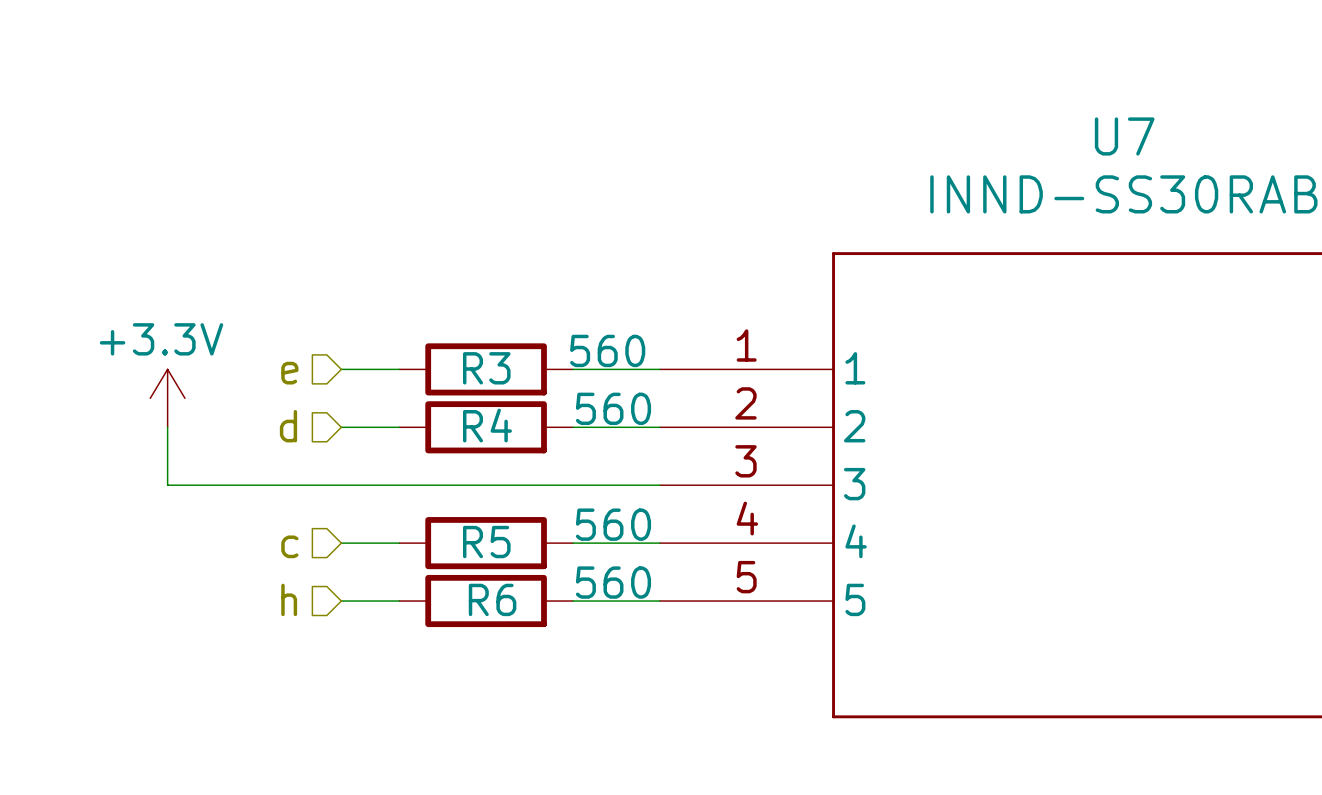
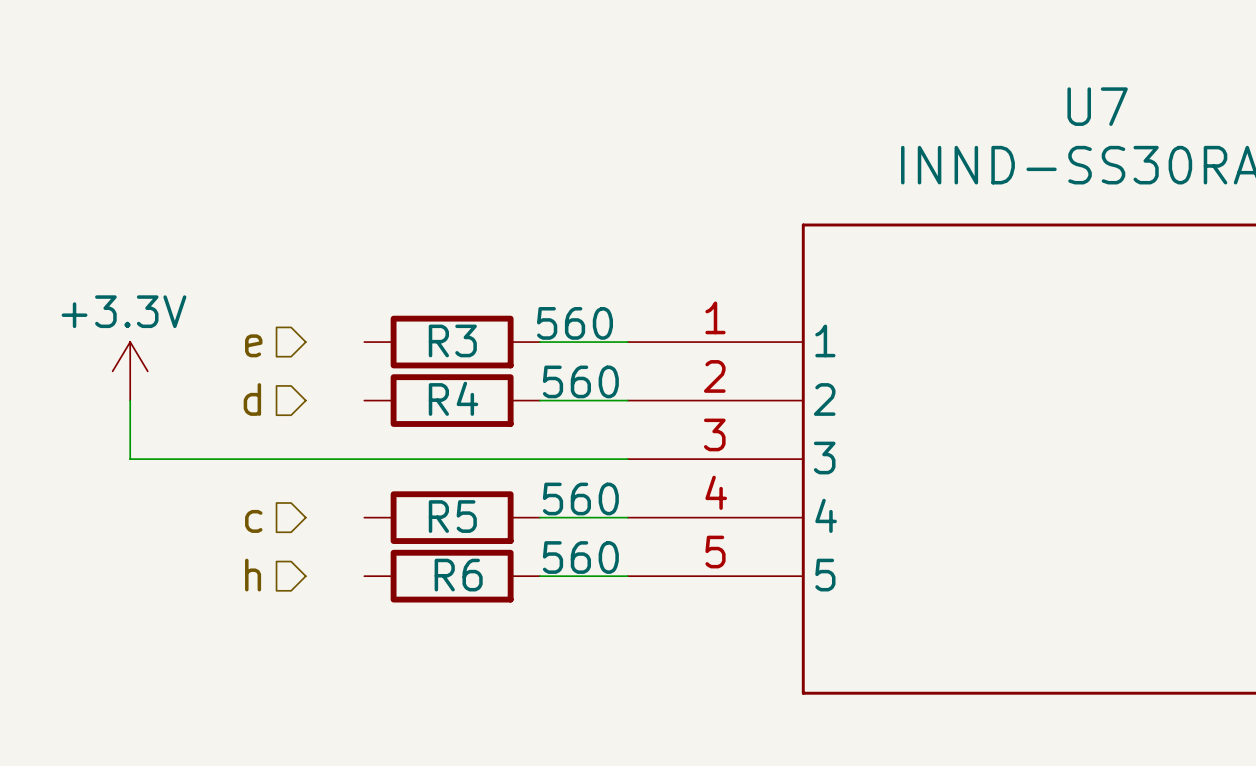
wire: (341, 369) (399, 369) -> none
wire: (341, 427) (399, 427) -> none
wire: (341, 543) (399, 543) -> none
wire: (341, 601) (399, 601) -> none

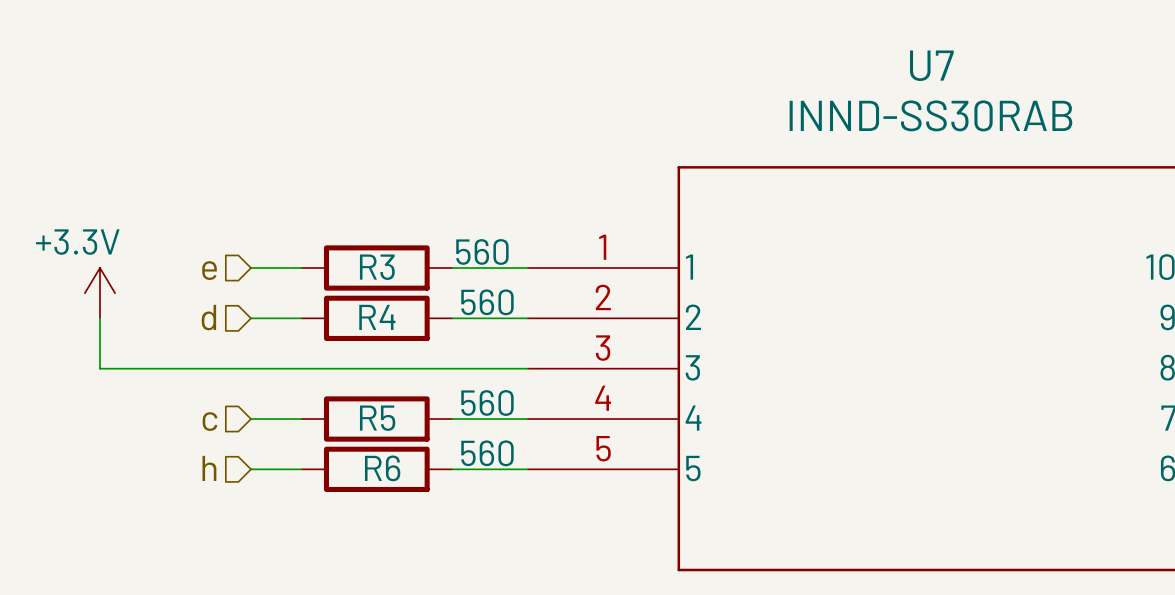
wire: none -> (250, 268) (301, 268)
wire: none -> (250, 318) (301, 318)
wire: none -> (250, 419) (301, 419)
wire: none -> (250, 469) (301, 469)

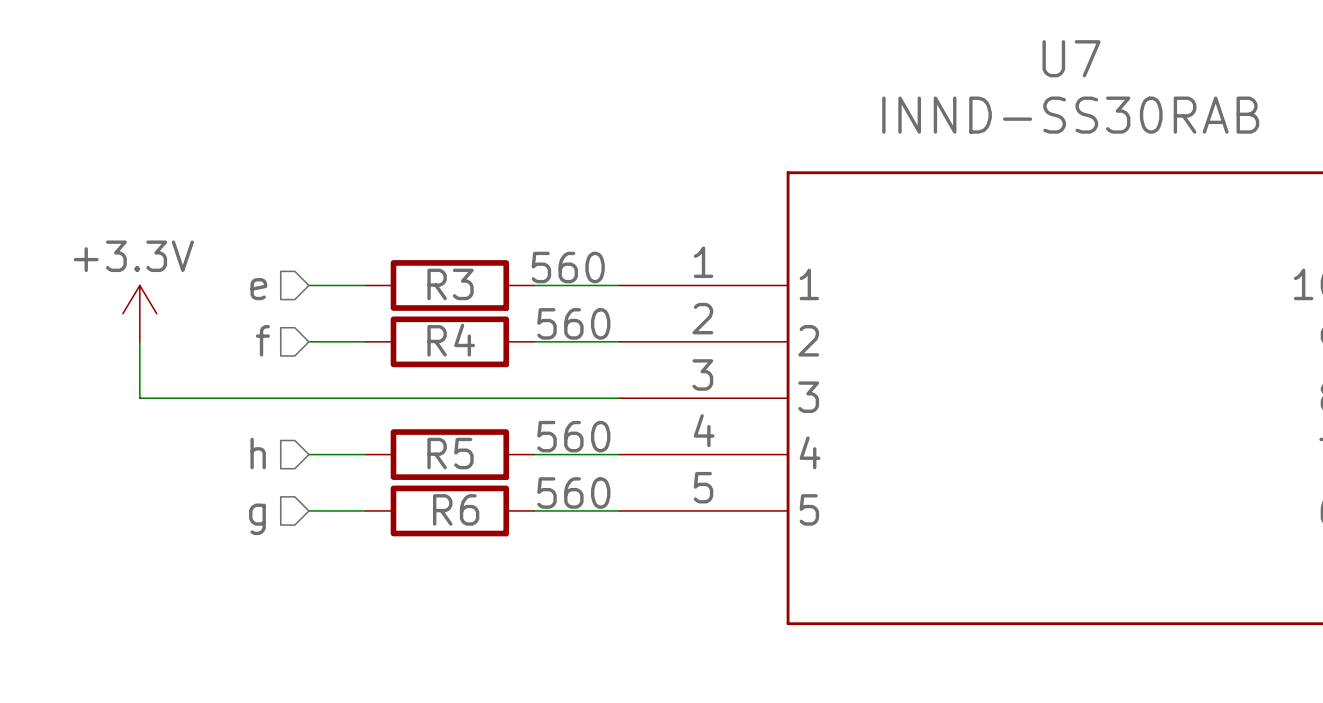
hierarchical label: d (208, 317) -> f (262, 340)
hierarchical label: c (209, 421) -> h (258, 453)
hierarchical label: h (209, 468) -> g (257, 519)

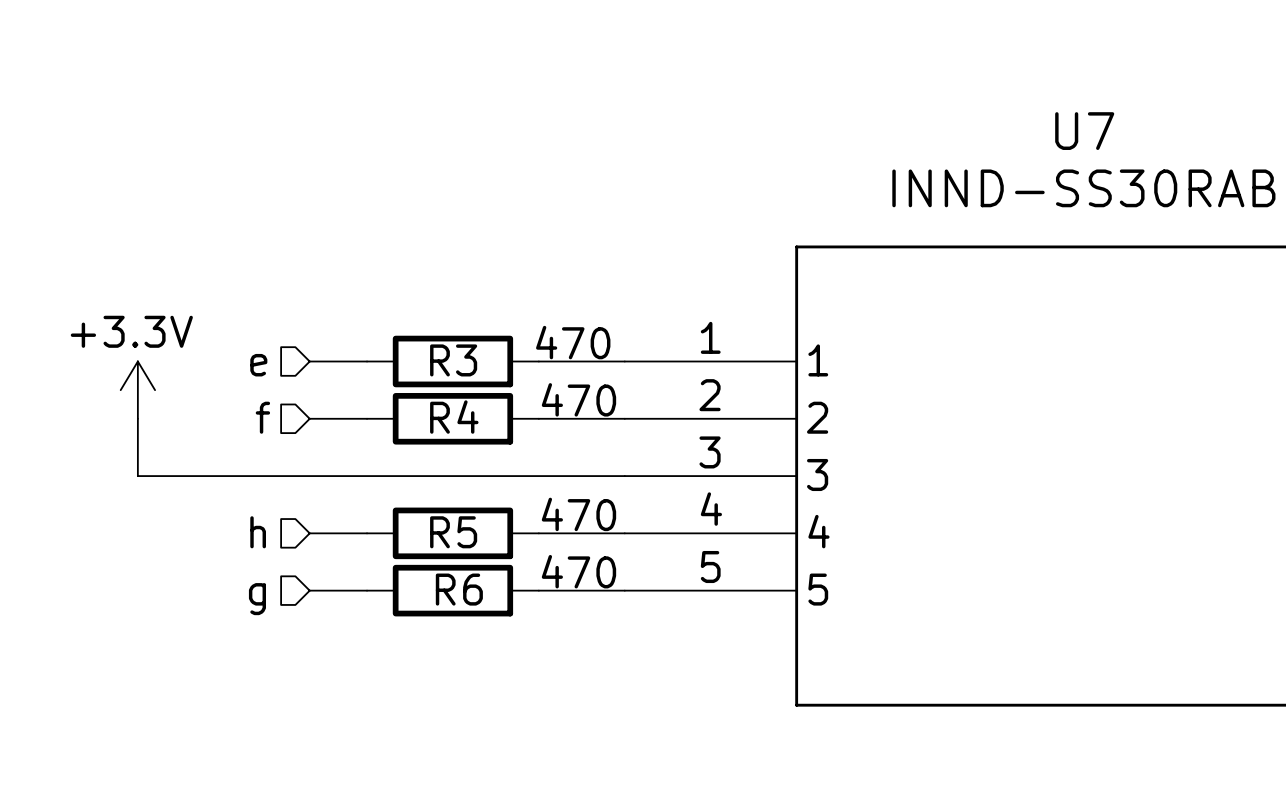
R3 value: 560 (568, 267) -> 470 (573, 342)
R4 value: 560 (573, 323) -> 470 (578, 399)
R5 value: 560 (573, 436) -> 470 (578, 514)
R6 value: 560 (573, 492) -> 470 (578, 571)

